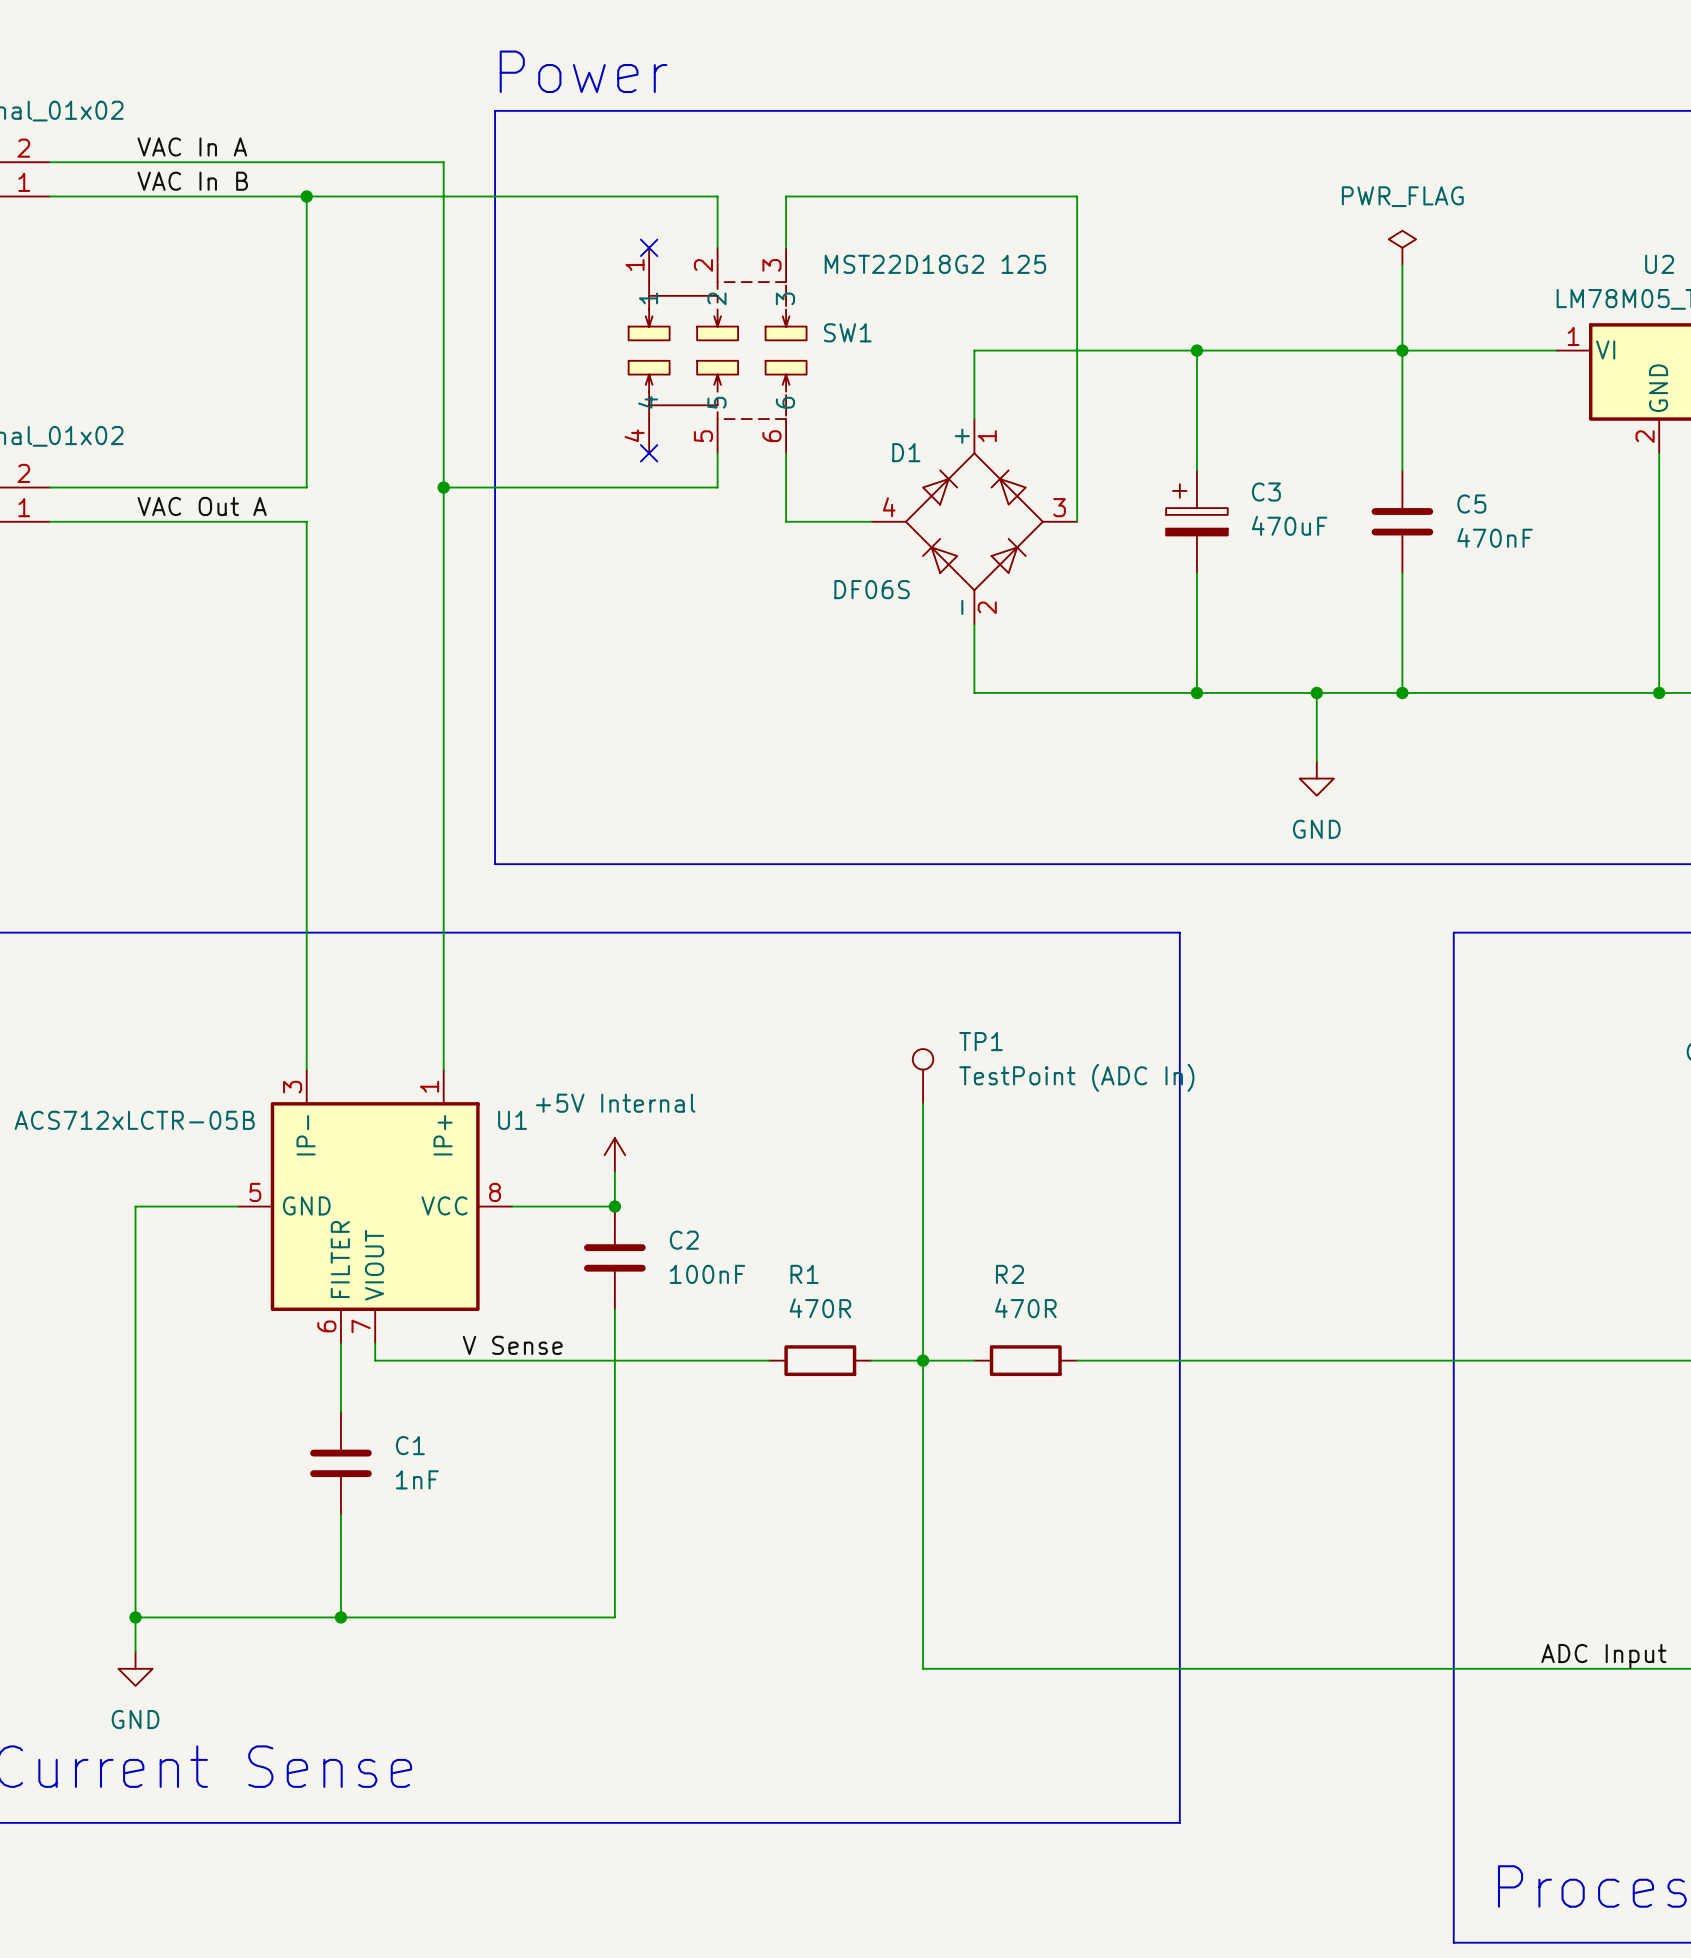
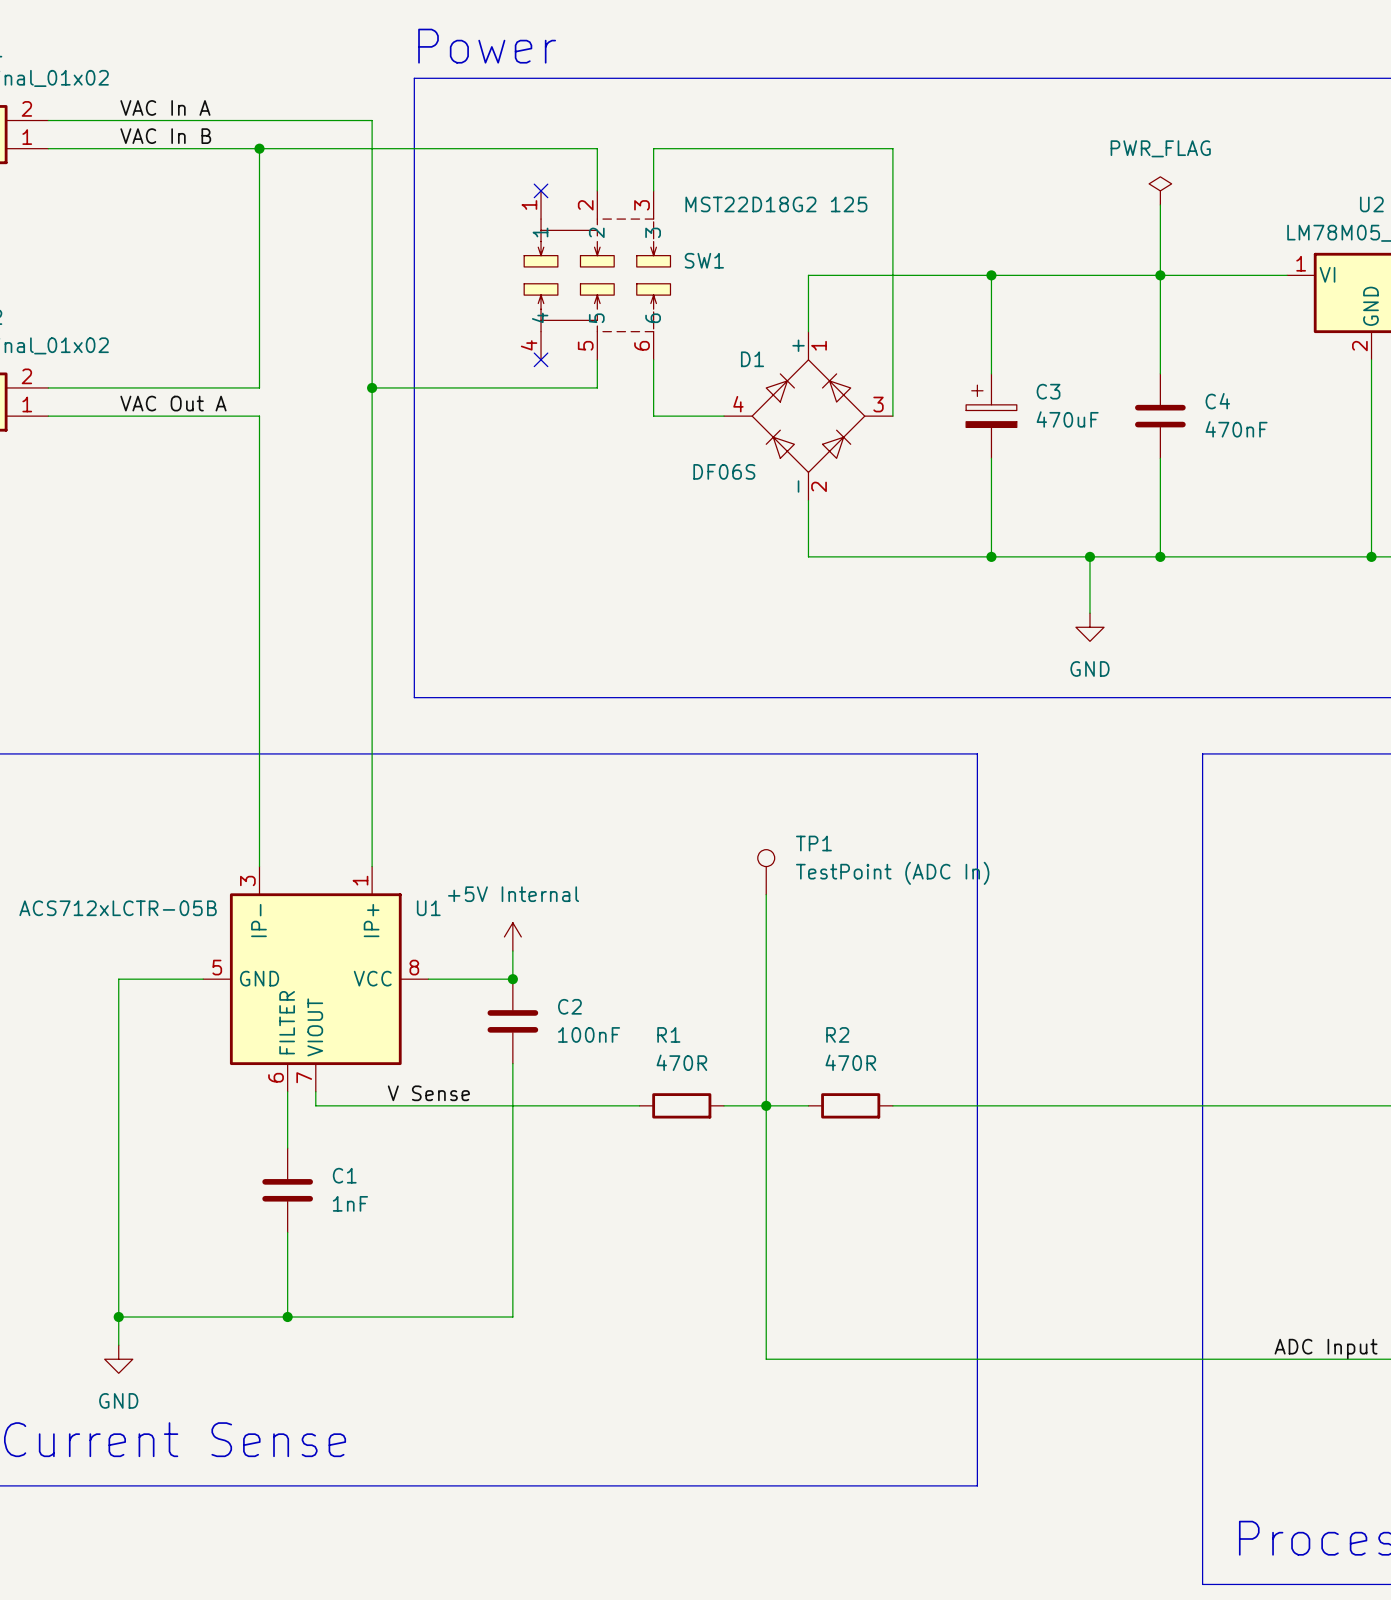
C5 name: C5 (1471, 504) -> C4 (1217, 401)

